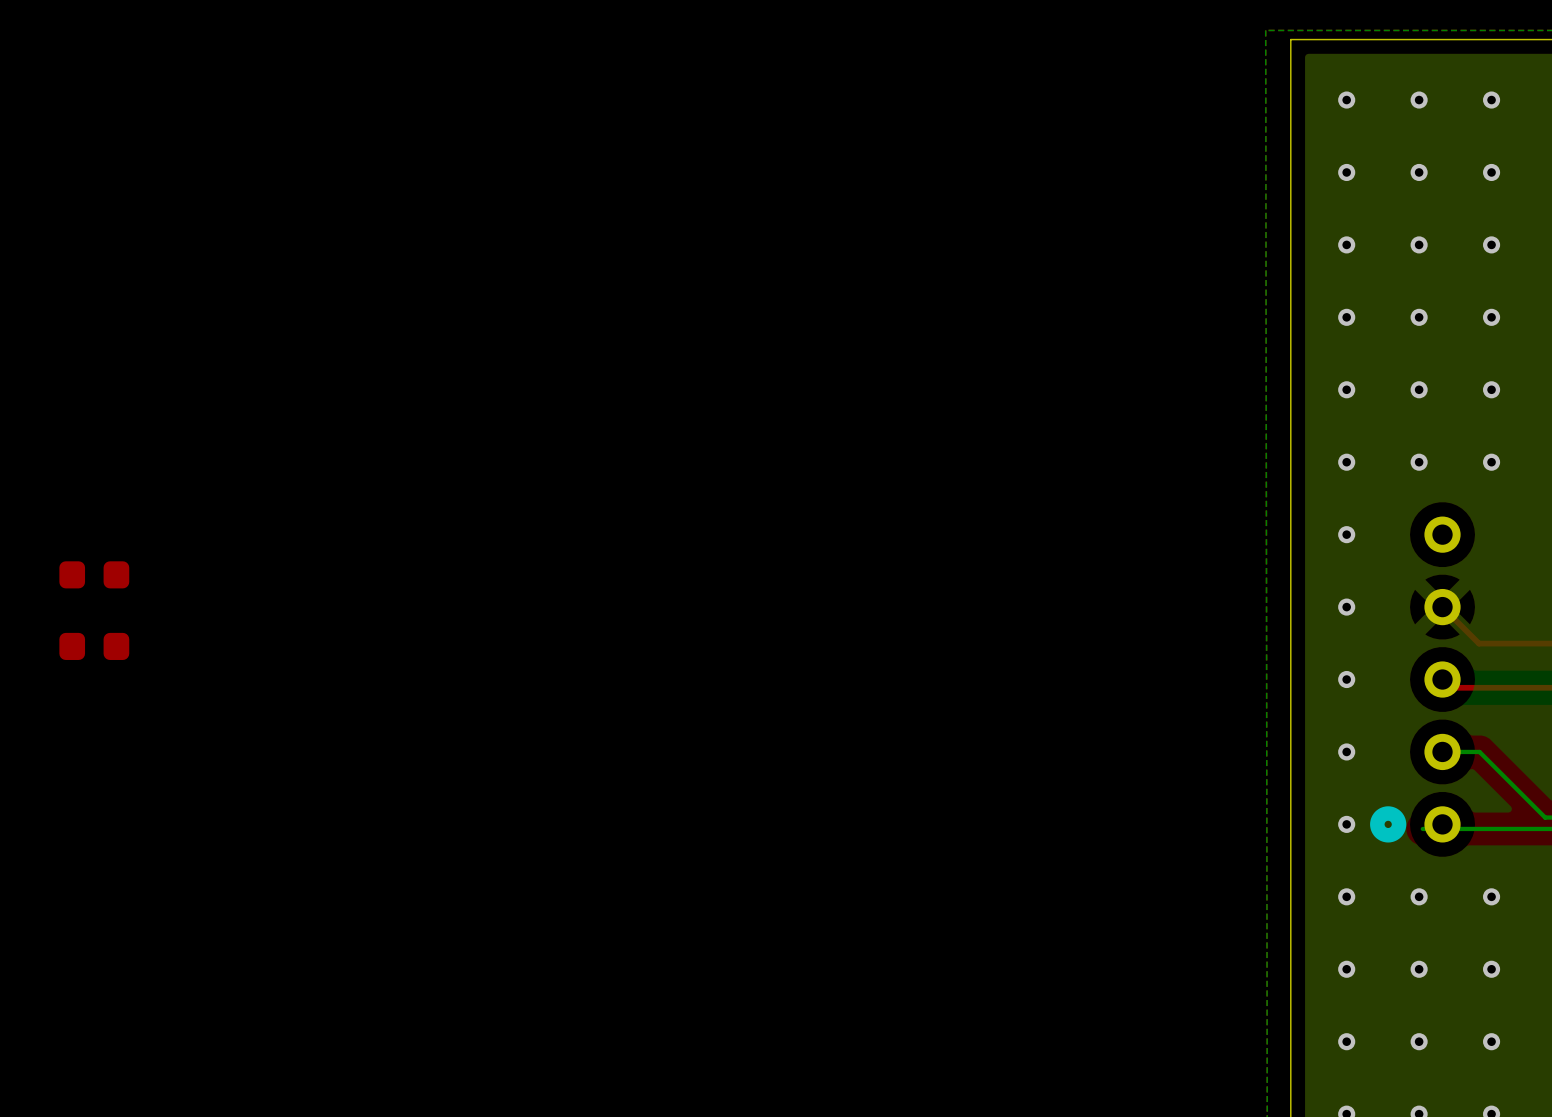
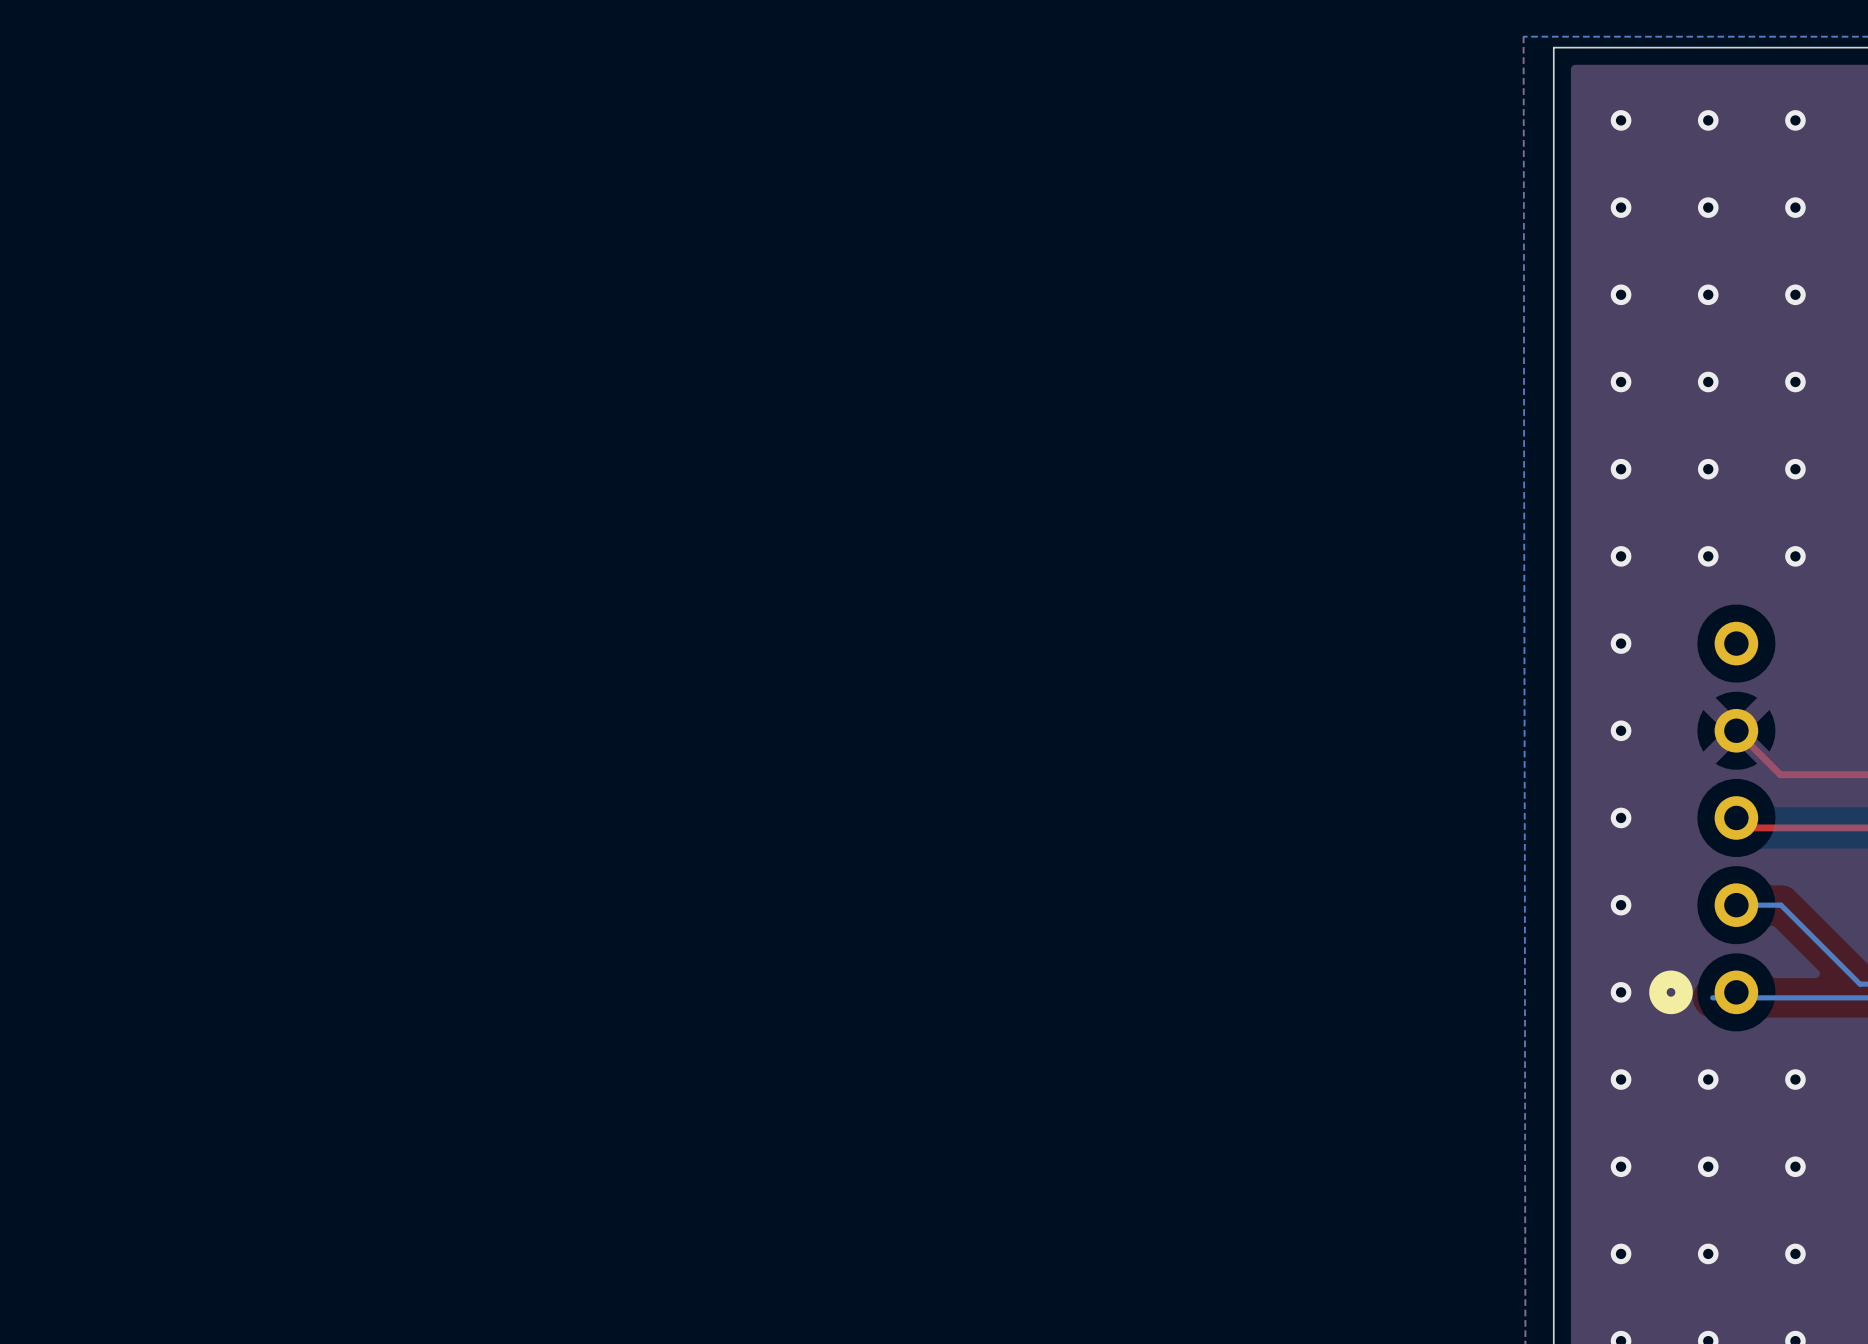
part: (94, 574) -> none
part: (94, 646) -> none

